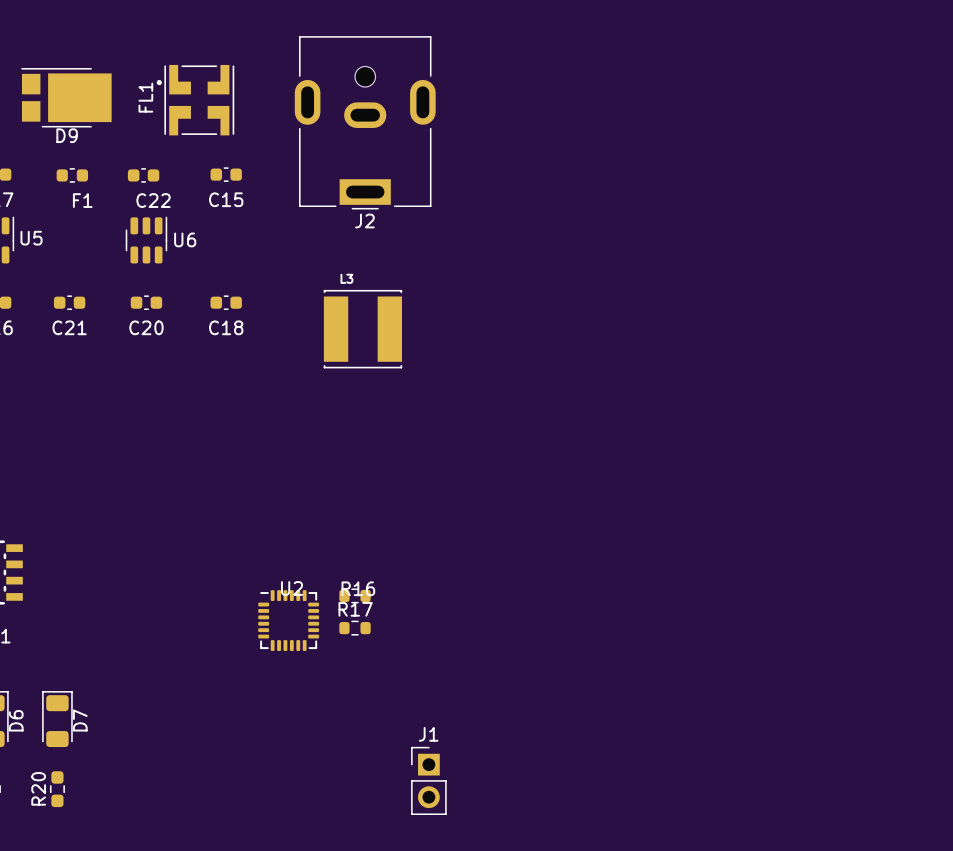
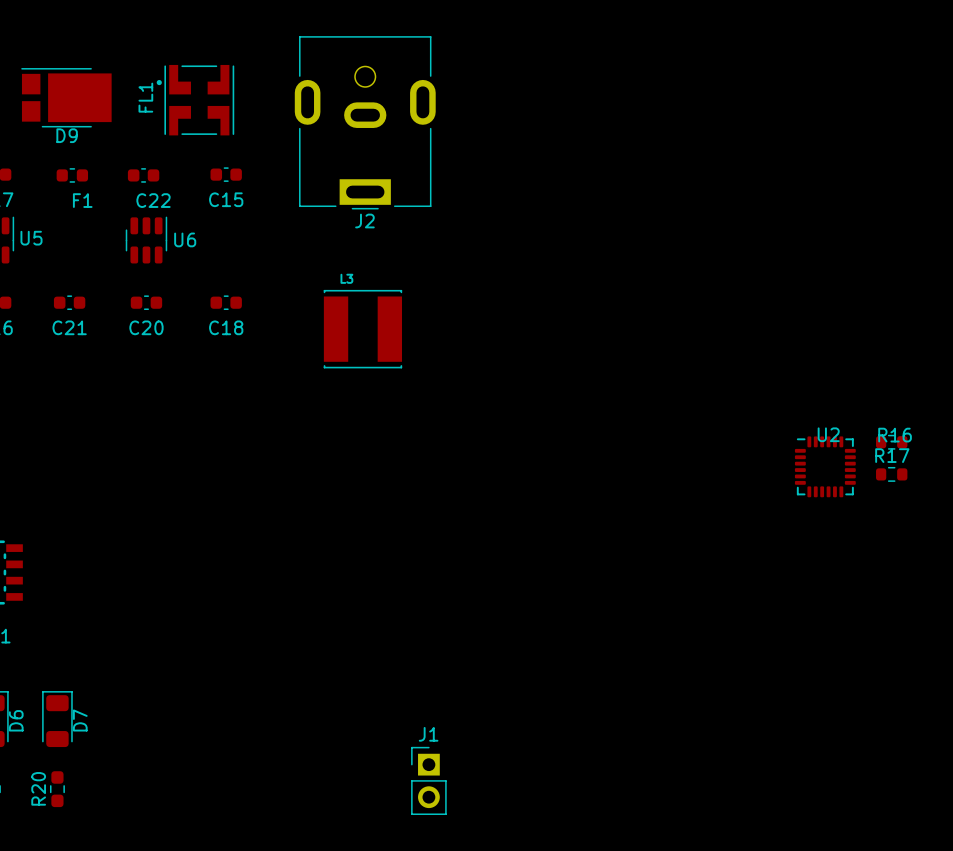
R16 position: (355, 595) -> (891, 442)
U2 position: (288, 620) -> (825, 466)
R17 position: (355, 628) -> (891, 474)

